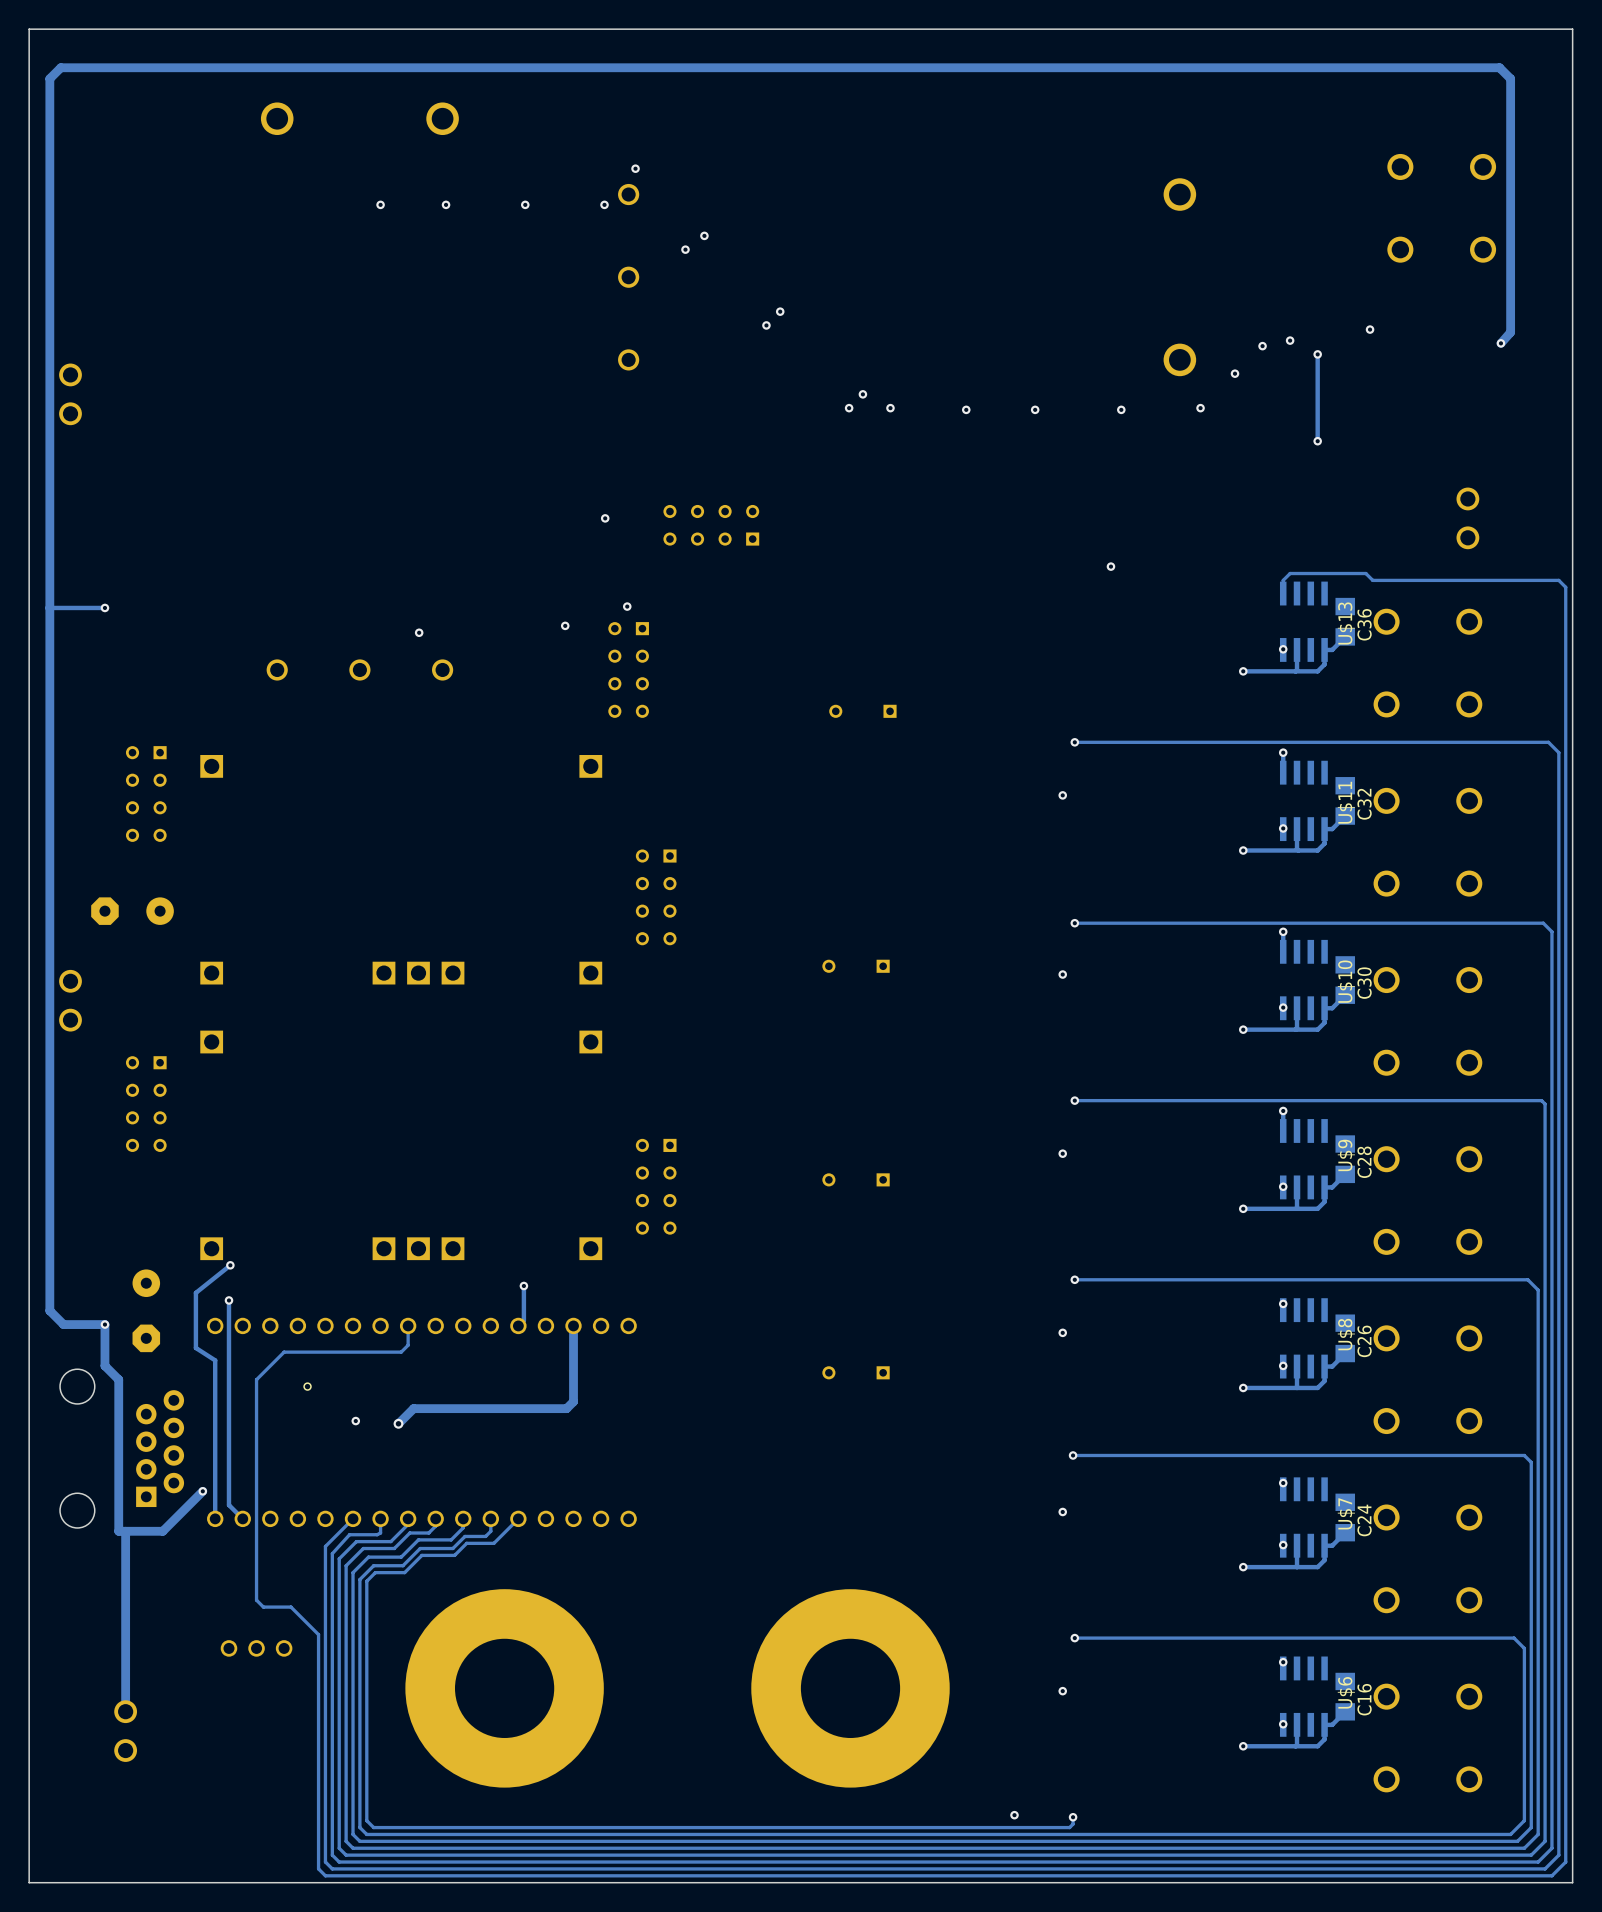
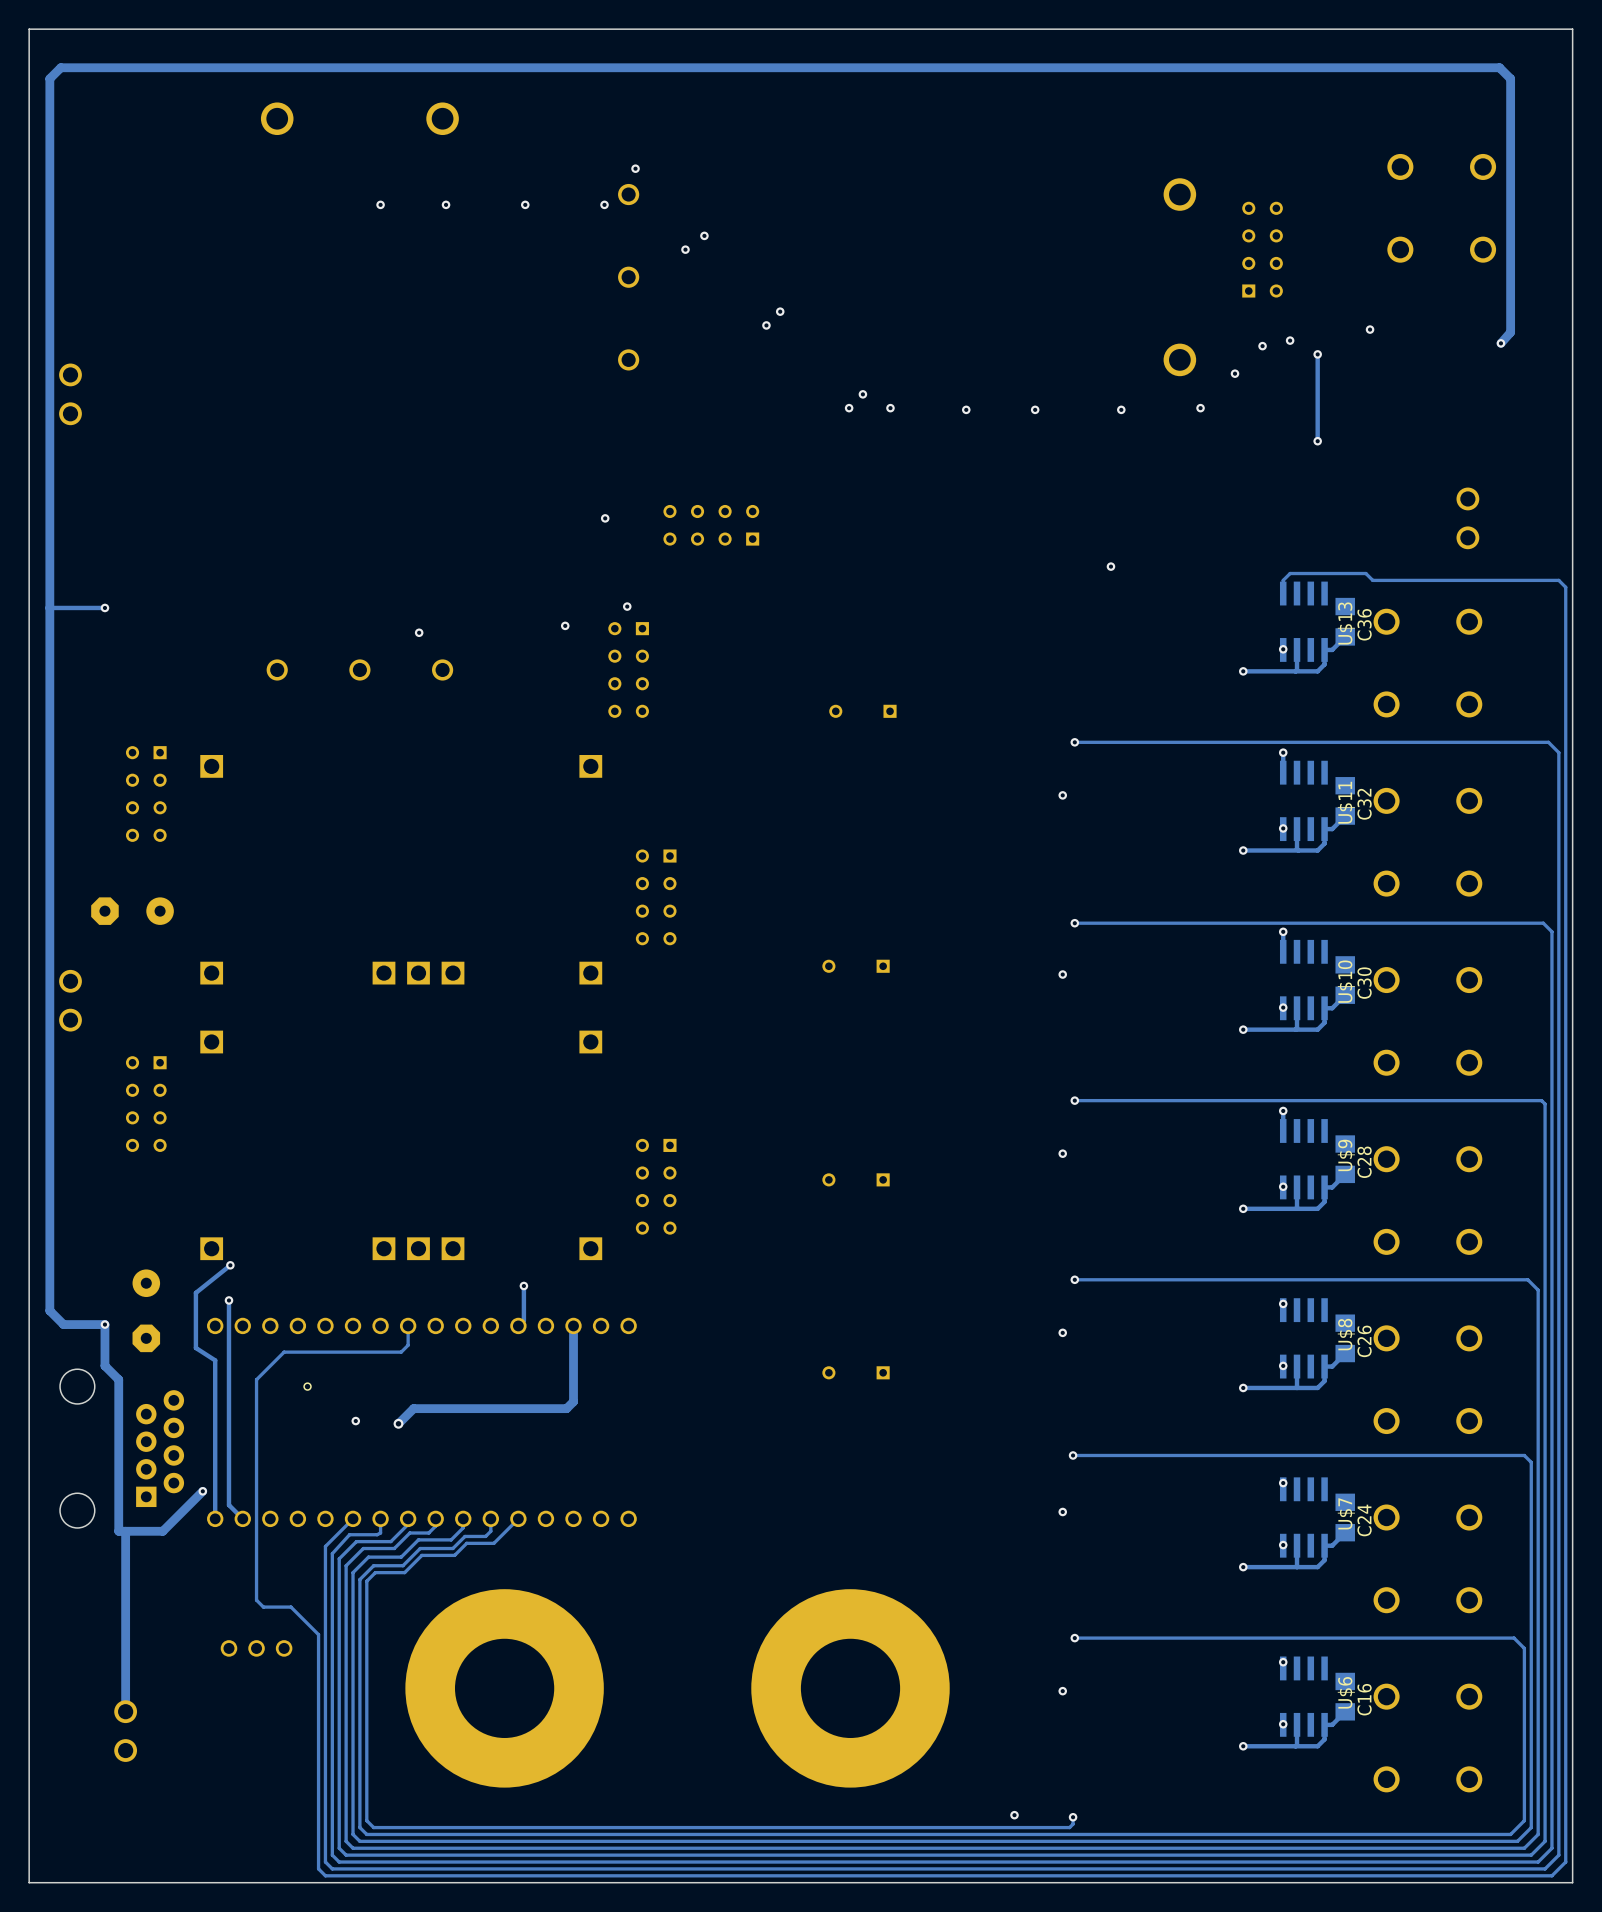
part: none -> (1262, 249)

